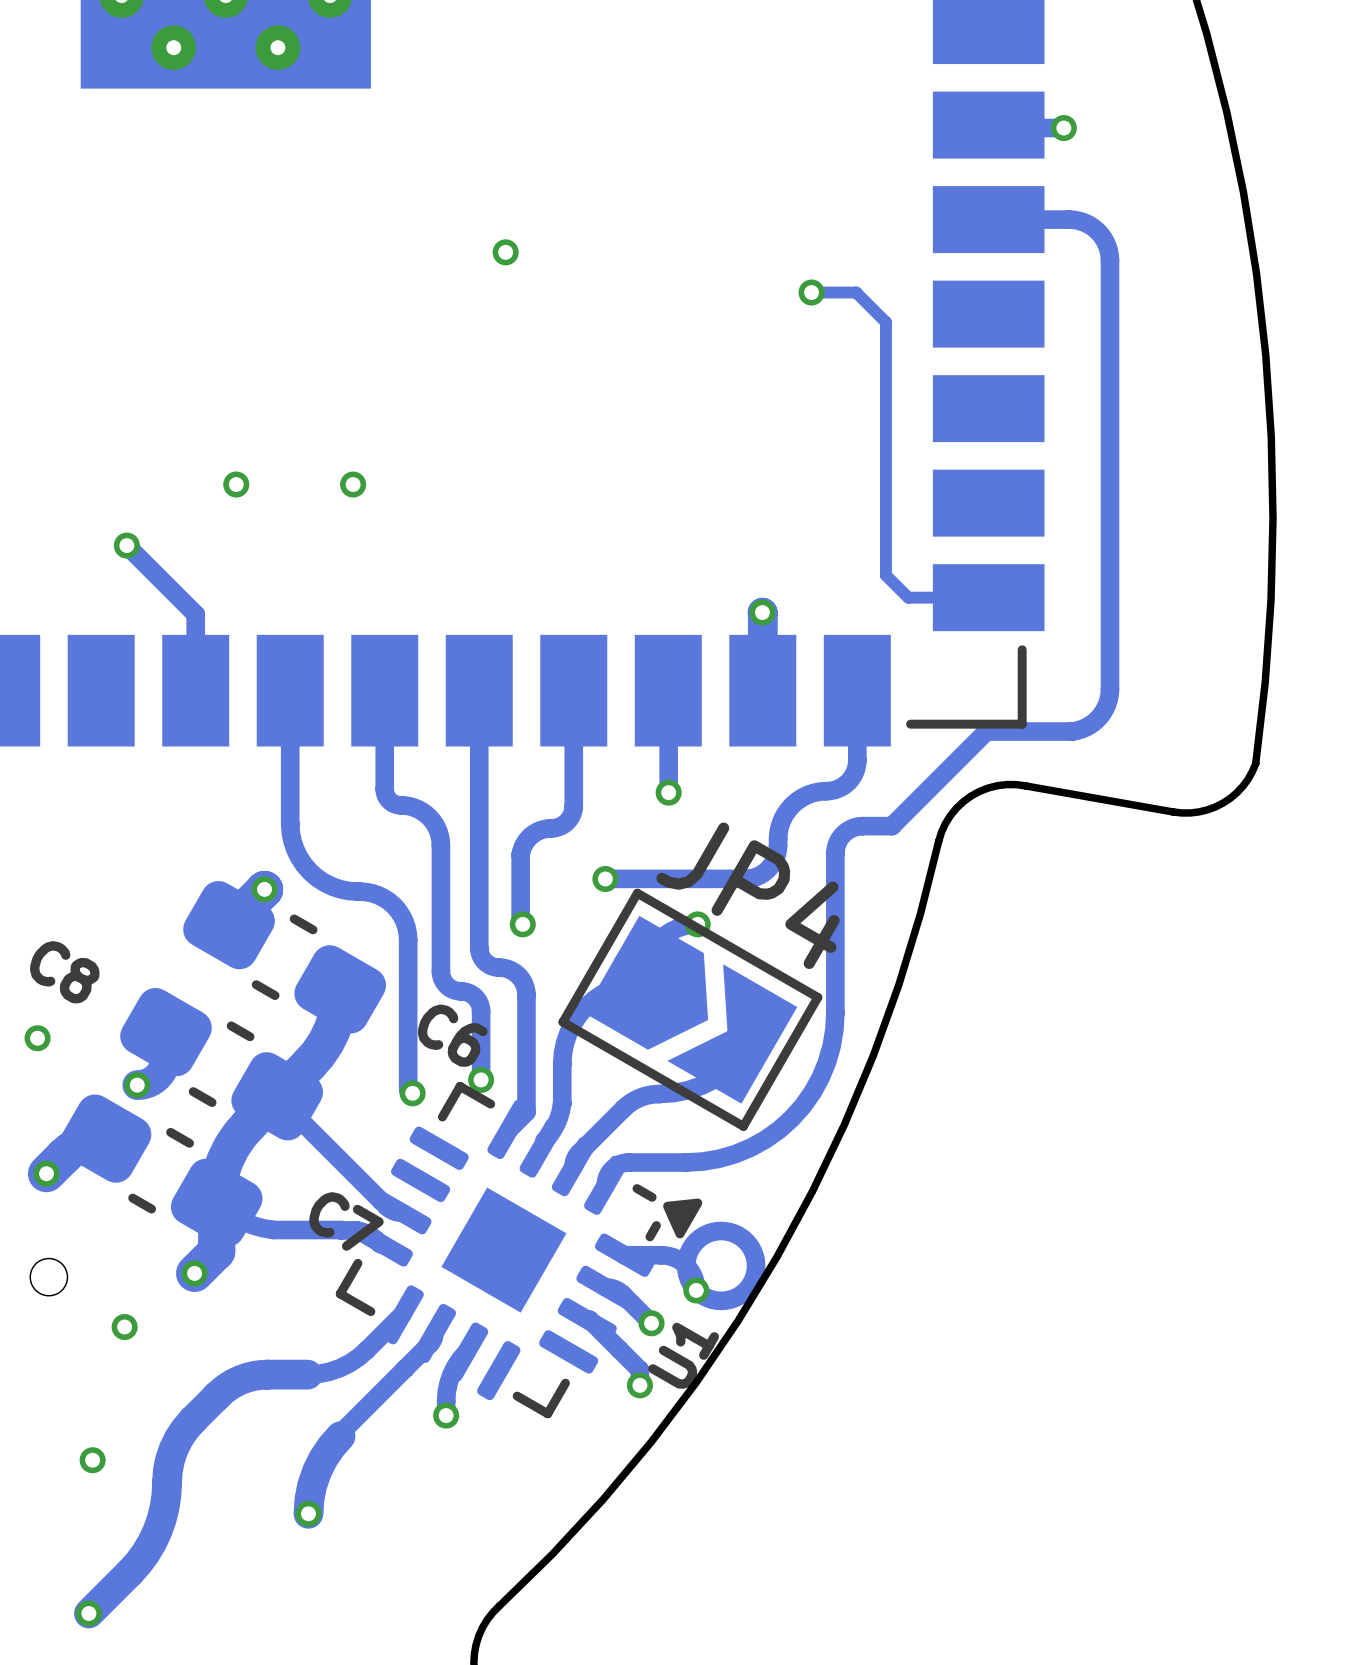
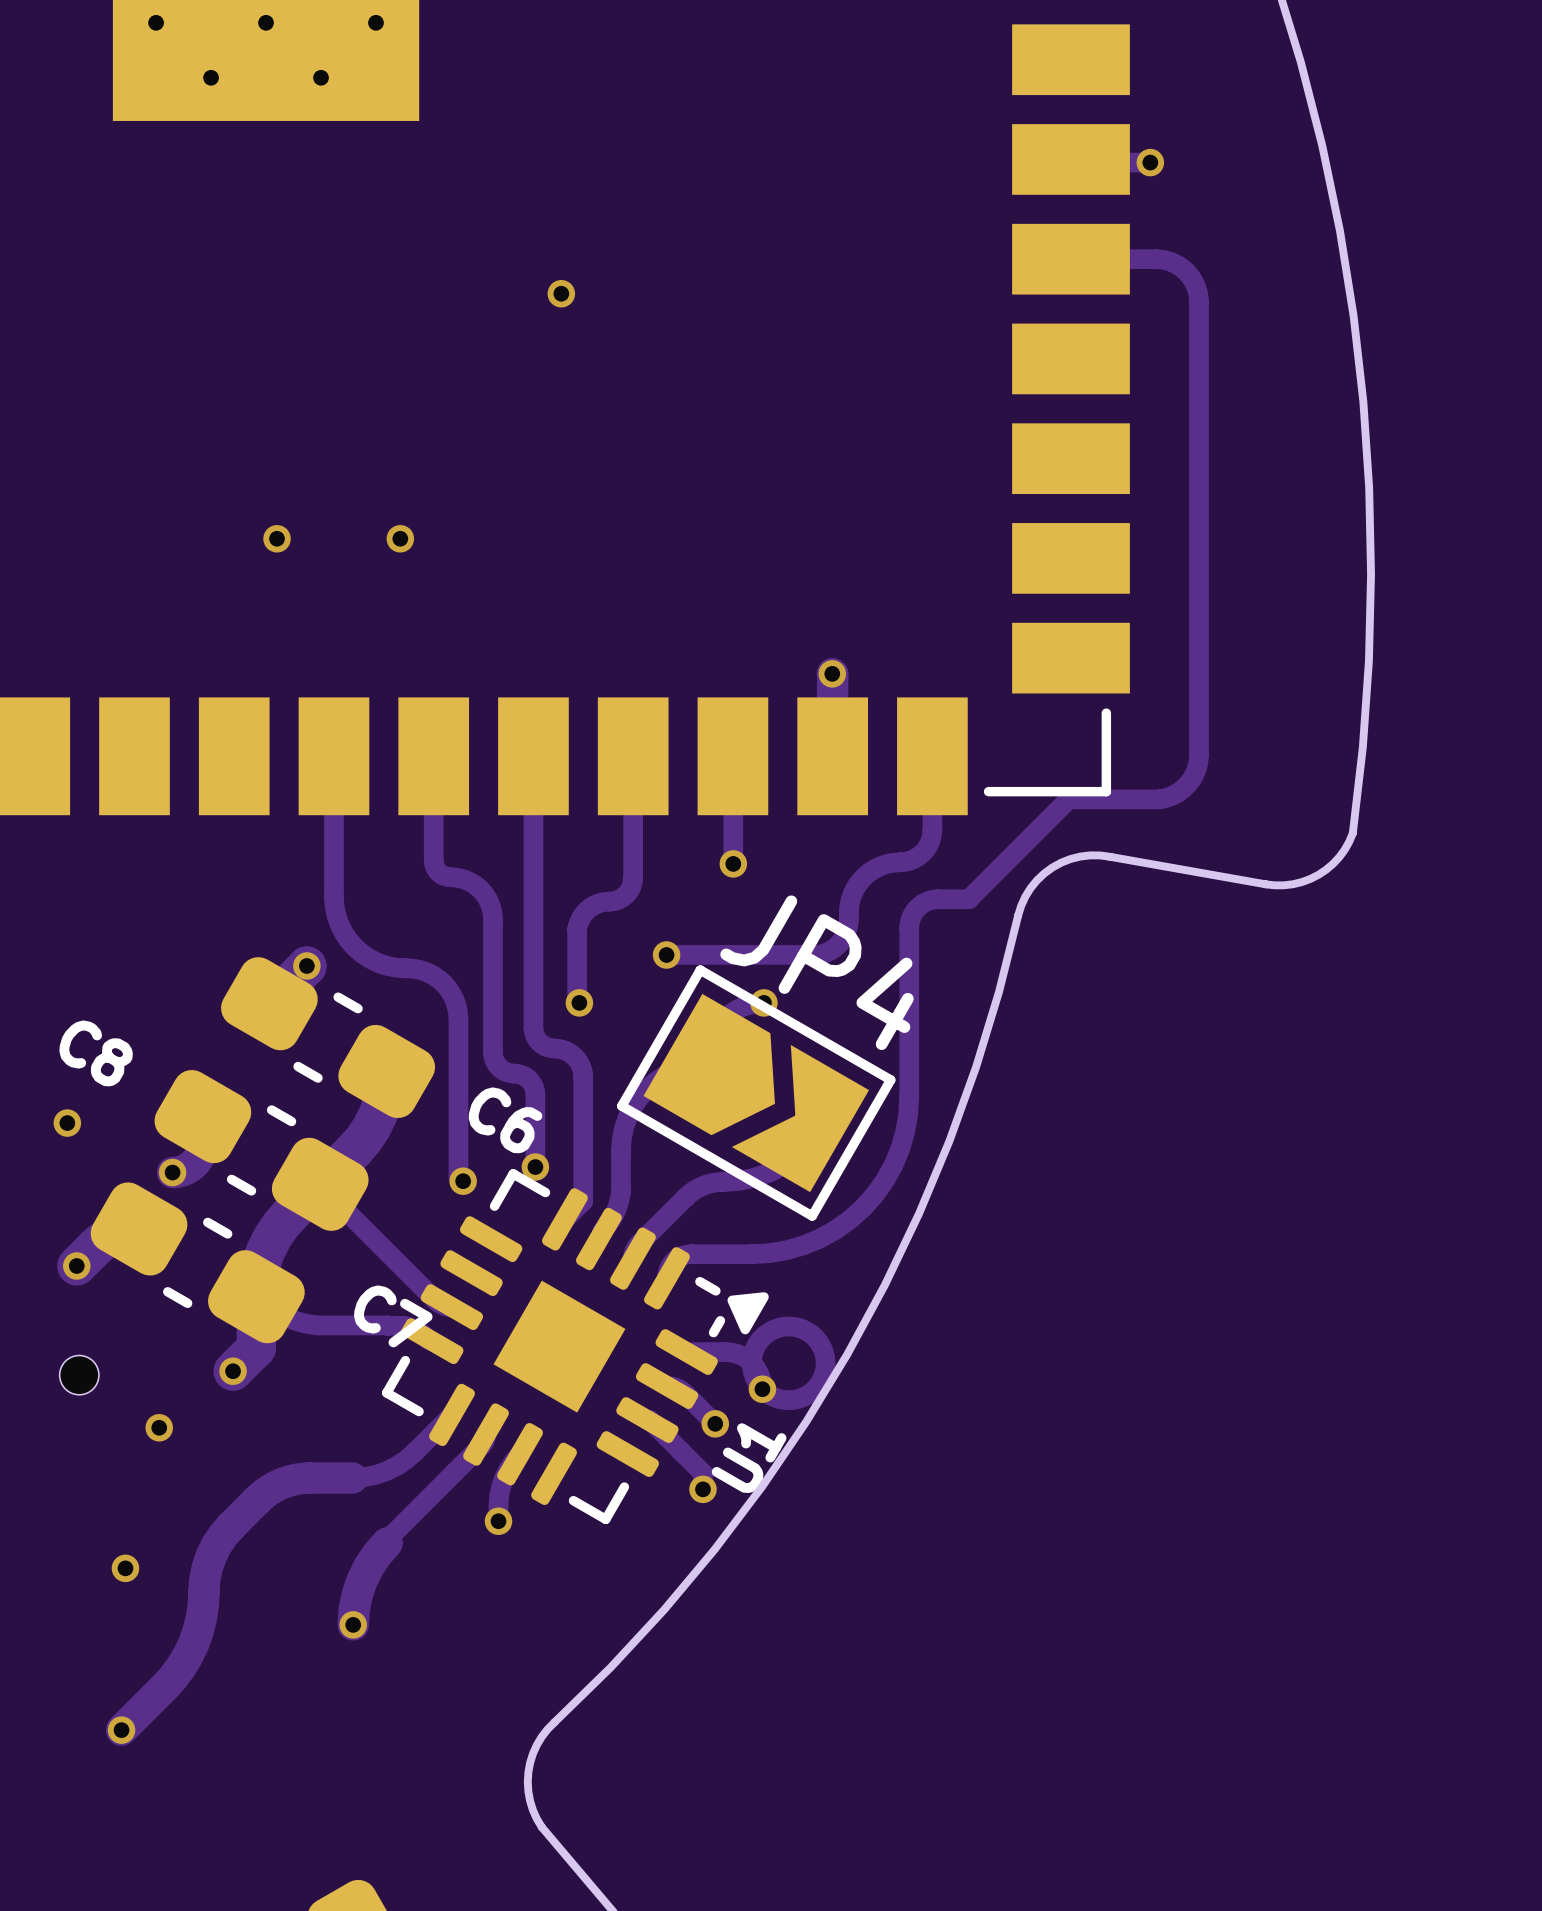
track: (811, 292) (856, 292) (885, 322) (885, 575) (908, 597) (988, 597) -> none
via: (811, 292) -> none
track: (126, 545) (195, 614) (195, 690) -> none
via: (126, 545) -> none

